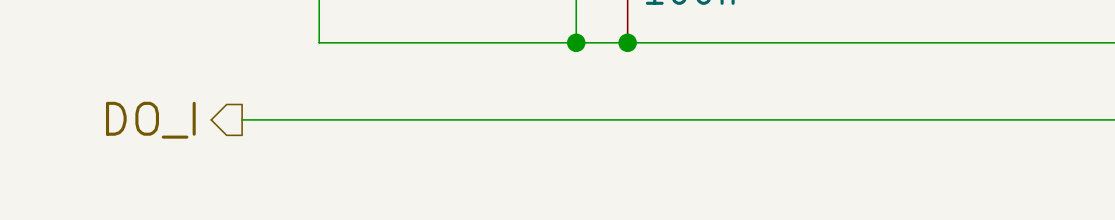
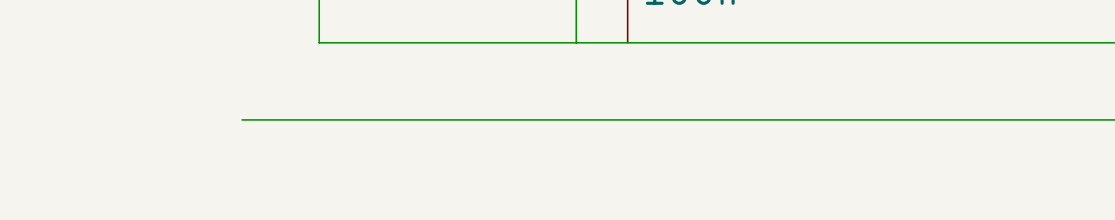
junction: (576, 42) -> none
junction: (627, 42) -> none
hierarchical label: DO_I (150, 120) -> none

